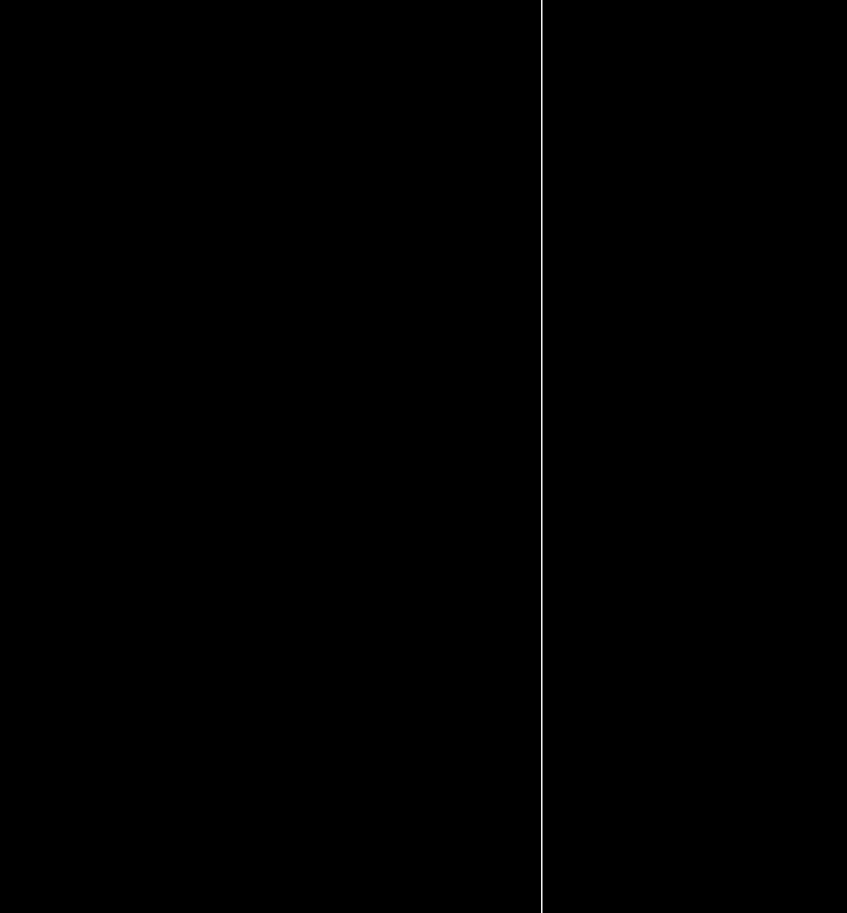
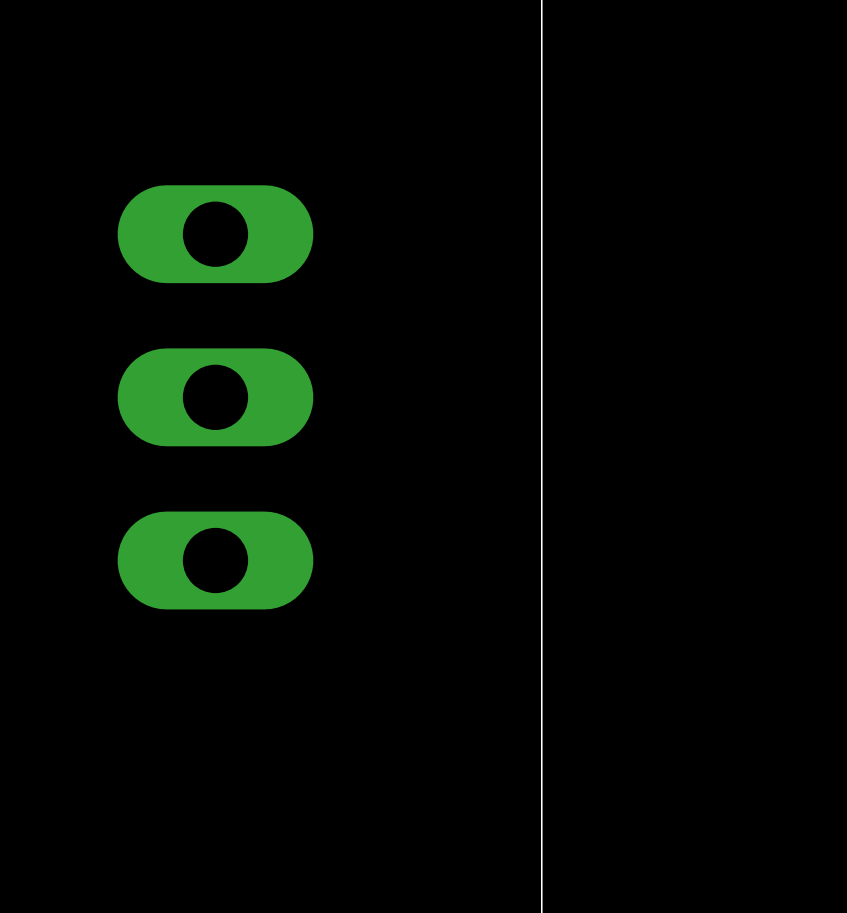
part: none -> (215, 397)

